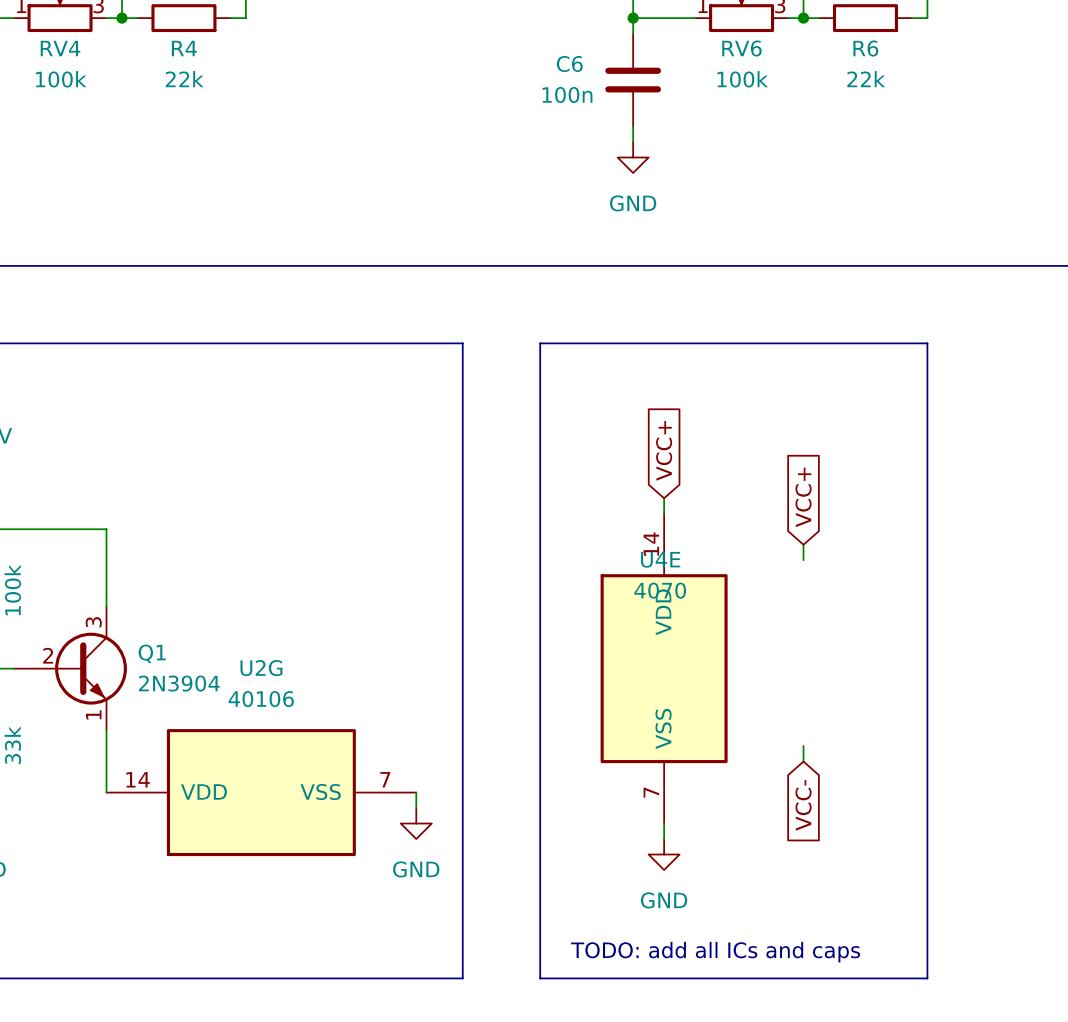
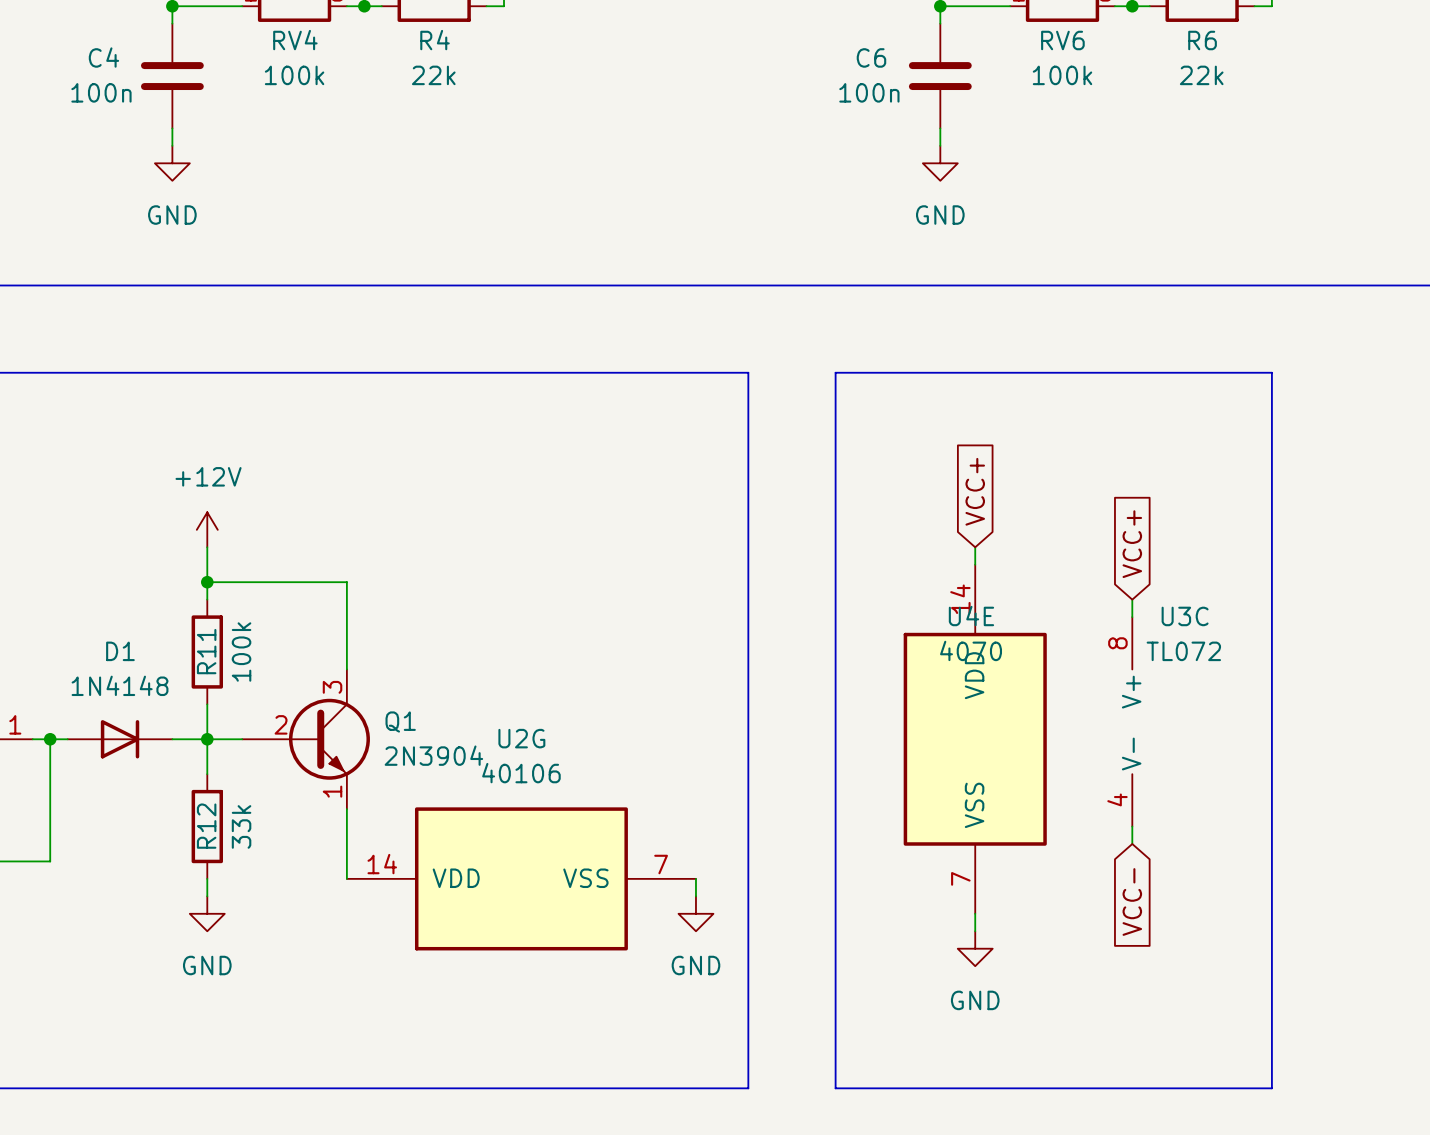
U3C: none -> TL072 (1132, 721)
text: TODO: add all ICs and caps (715, 952) -> none

